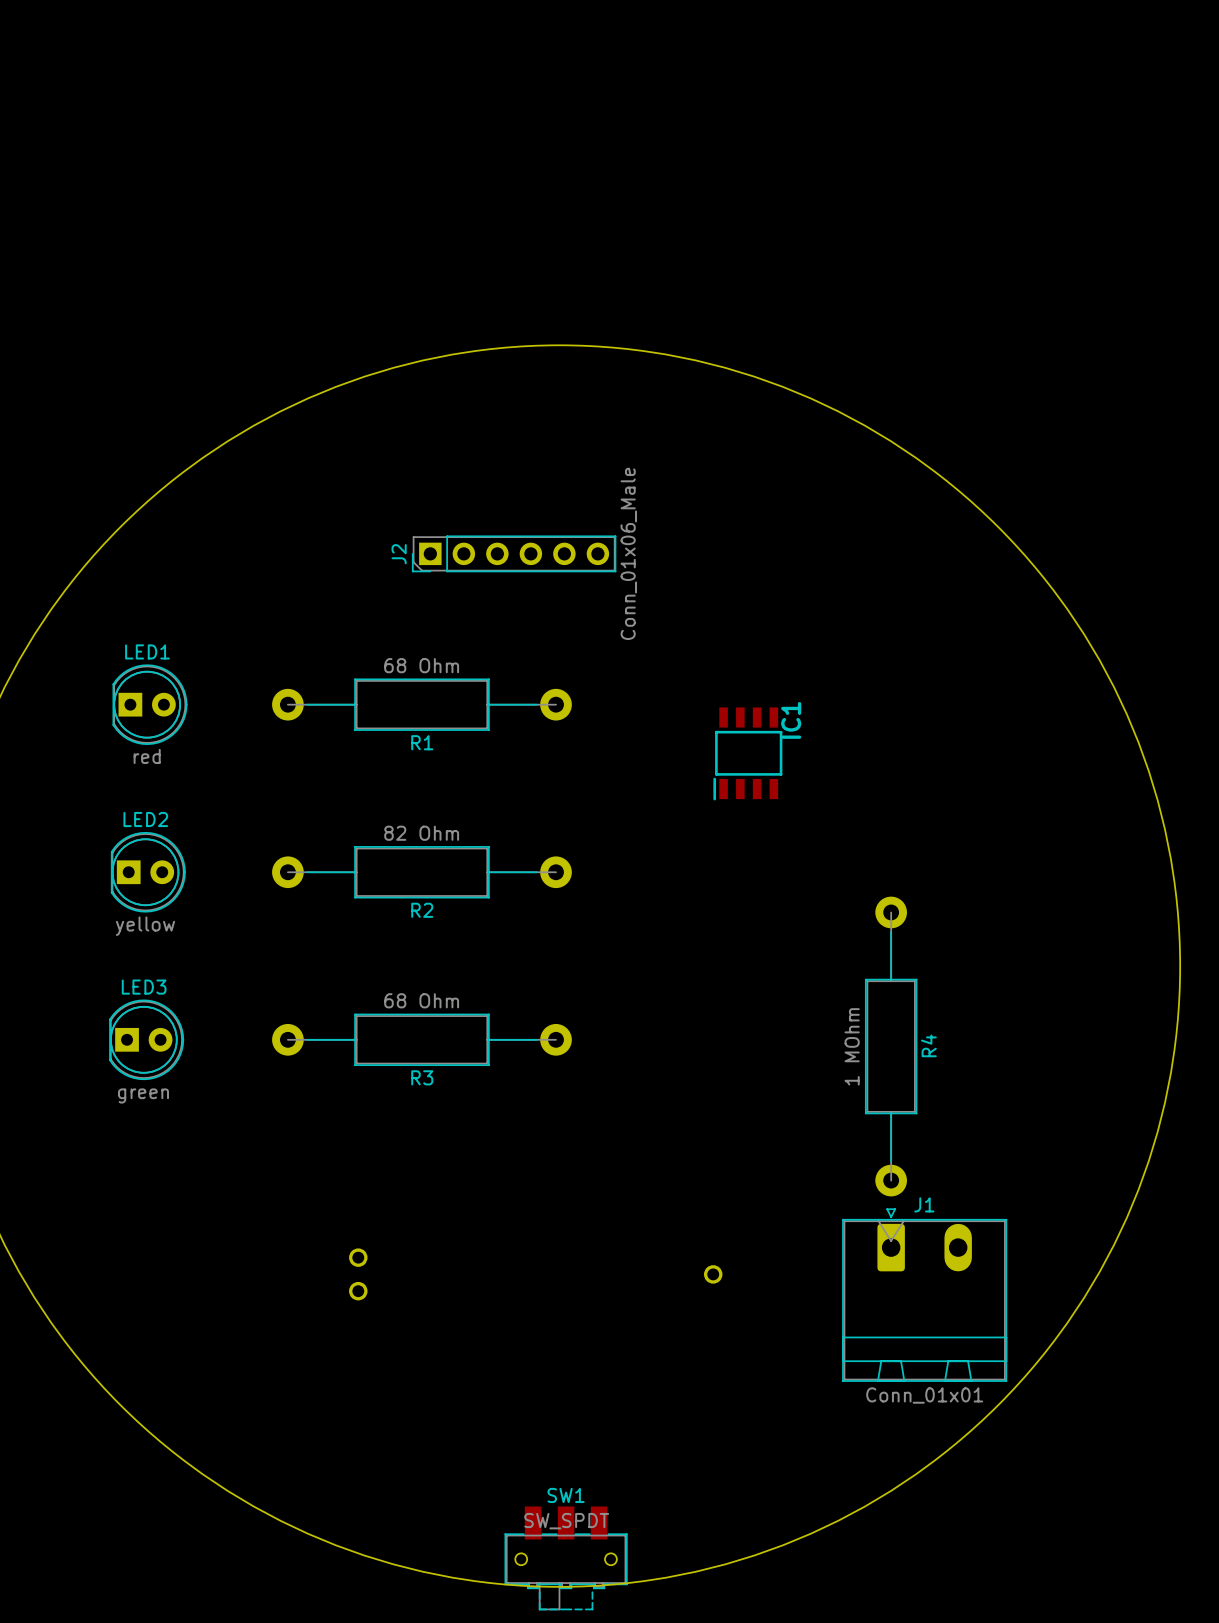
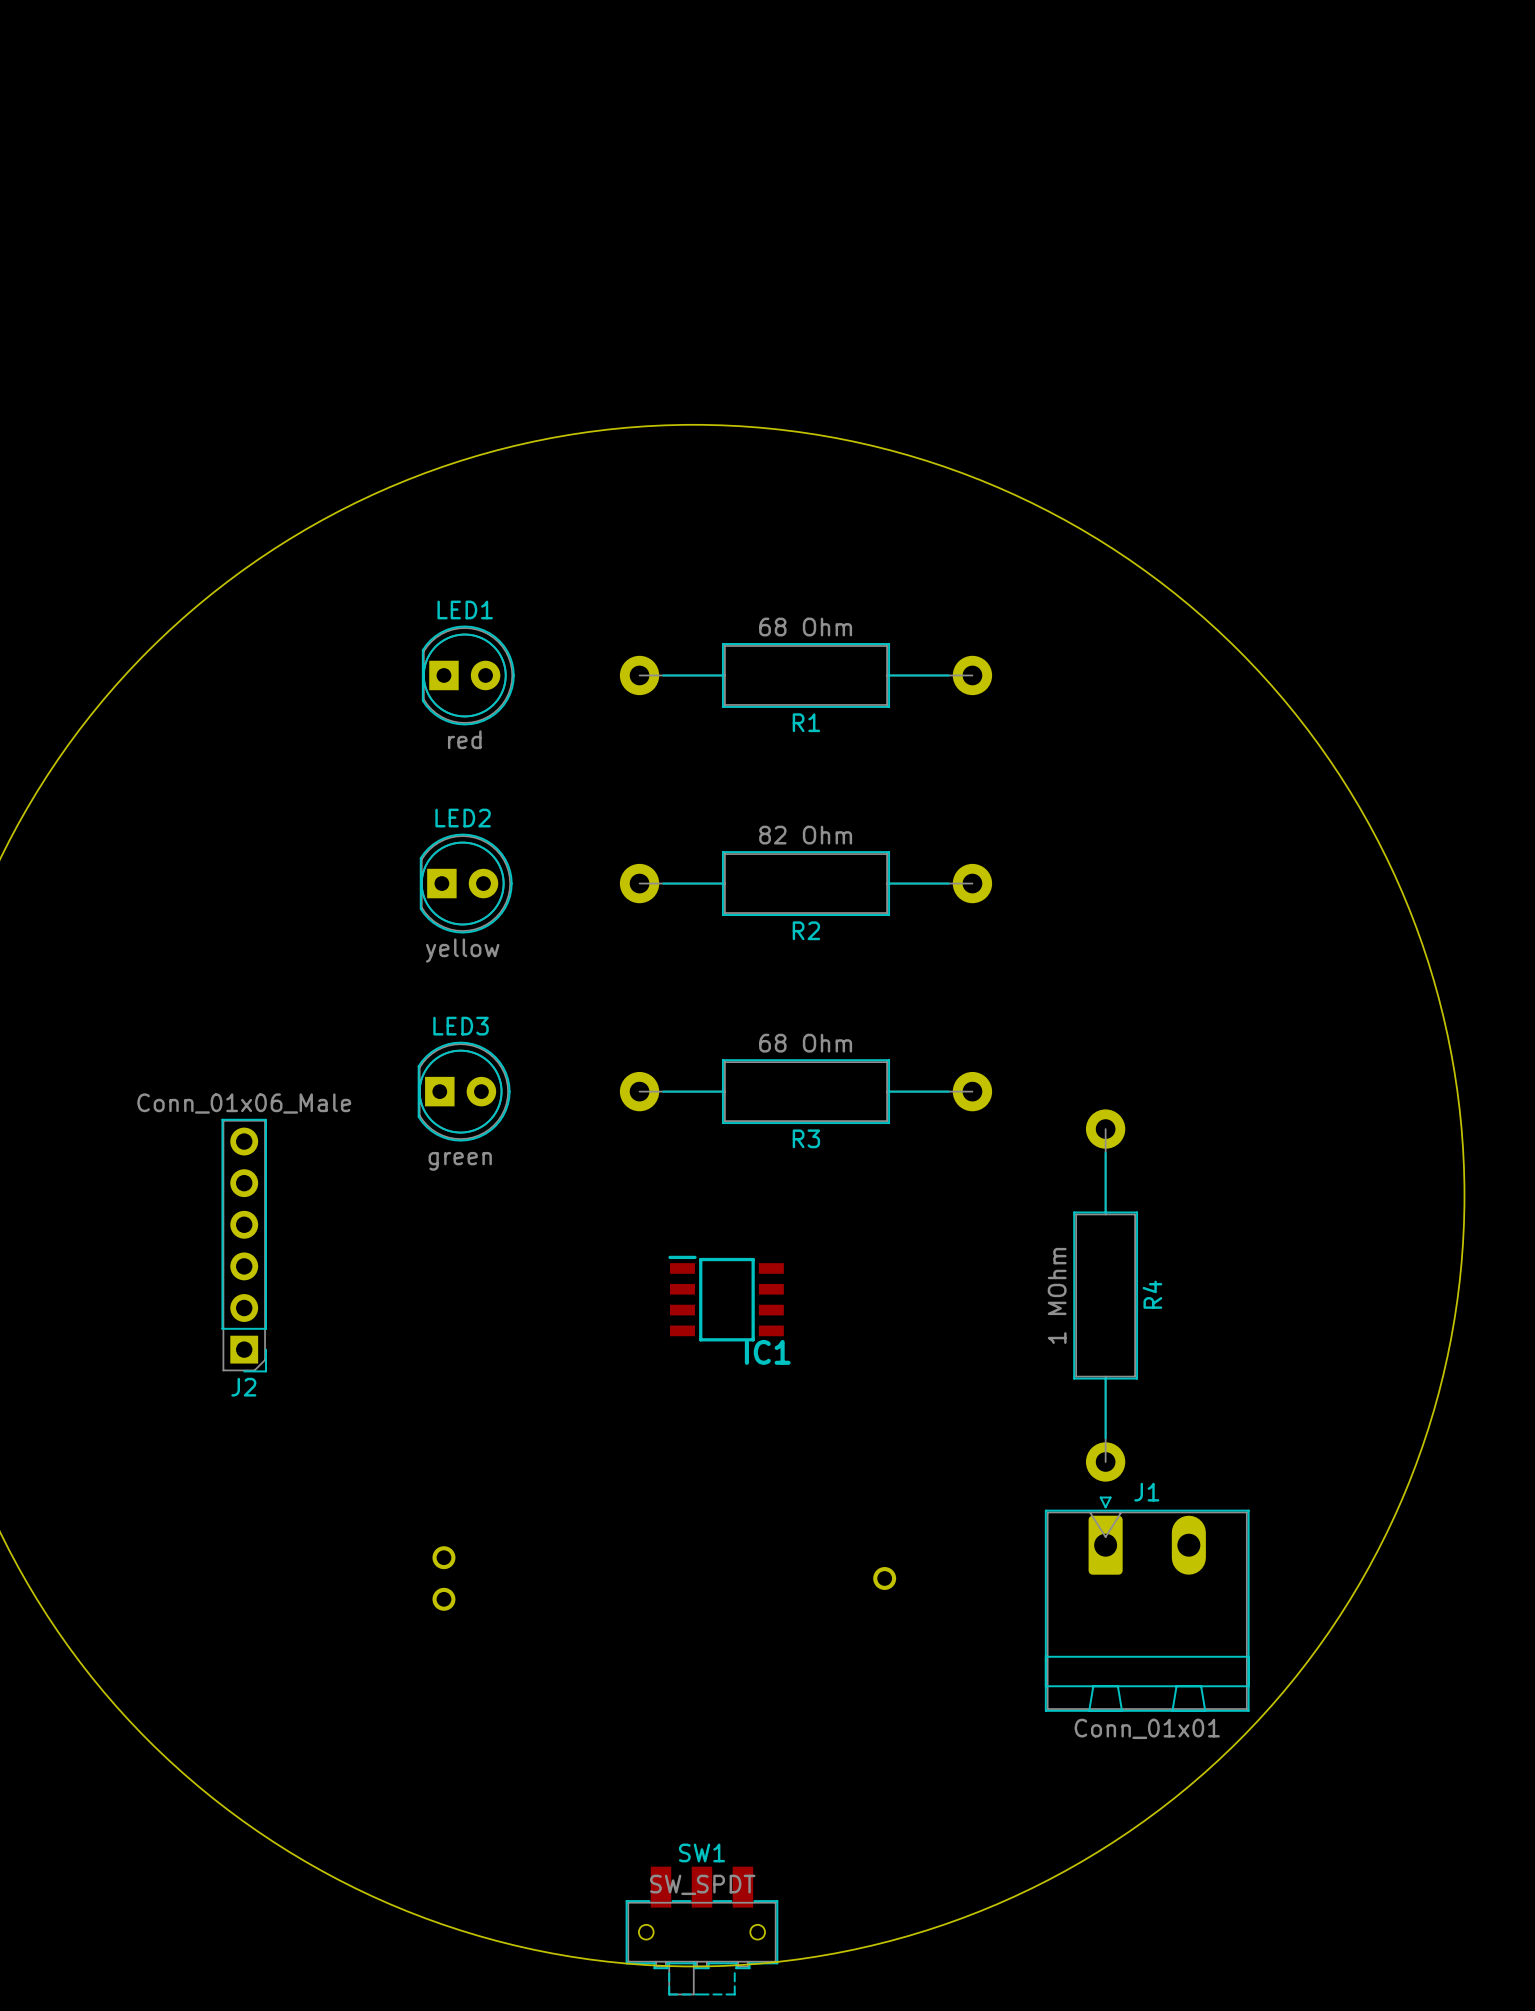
J2 rotation: 0° (514, 553) -> 90° counterclockwise (244, 1245)
J2 position: (514, 553) -> (244, 1245)
LED1 position: (149, 704) -> (468, 675)
R1 position: (421, 704) -> (806, 675)
IC1 rotation: 0° (747, 753) -> 90° clockwise (726, 1298)
IC1 position: (747, 753) -> (726, 1298)
LED2 position: (148, 872) -> (466, 883)
R2 position: (421, 872) -> (806, 883)
LED3 position: (146, 1039) -> (464, 1091)
R3 position: (421, 1039) -> (806, 1091)

